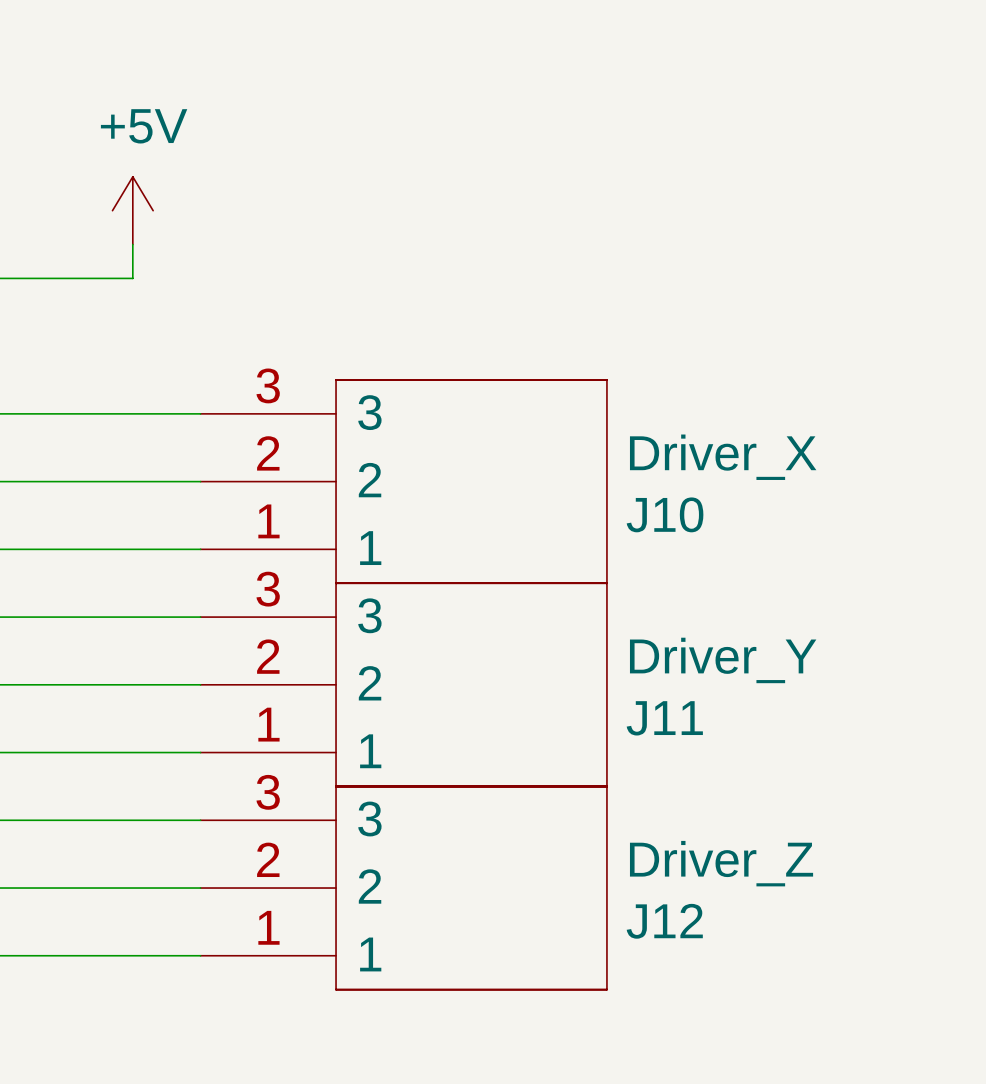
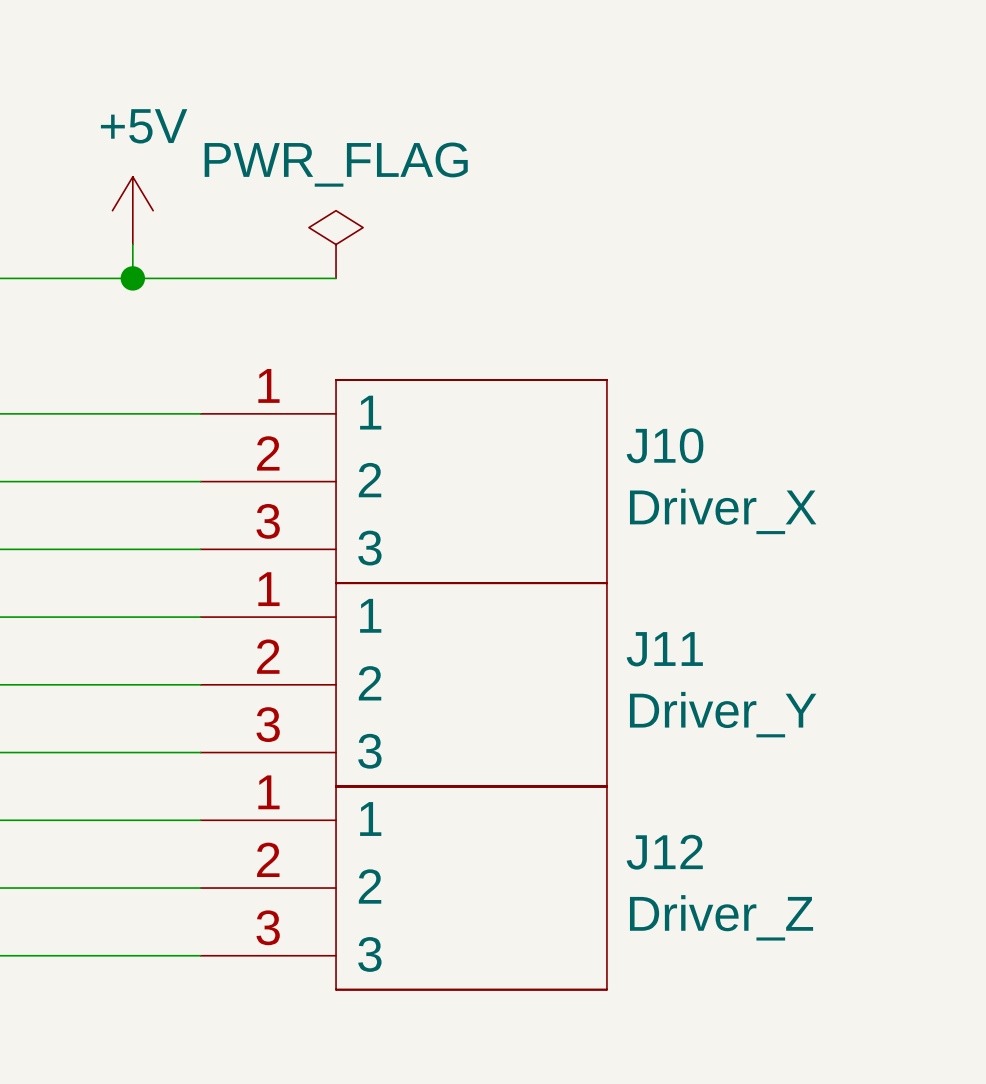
power symbol: none -> PWR_FLAG (336, 244)
wire: none -> (132, 278) (336, 278)
junction: none -> (132, 278)
J10 flip: as is (471, 481) -> up-down (471, 481)
J11 flip: as is (471, 684) -> up-down (471, 684)
J12 flip: as is (471, 888) -> up-down (471, 888)

